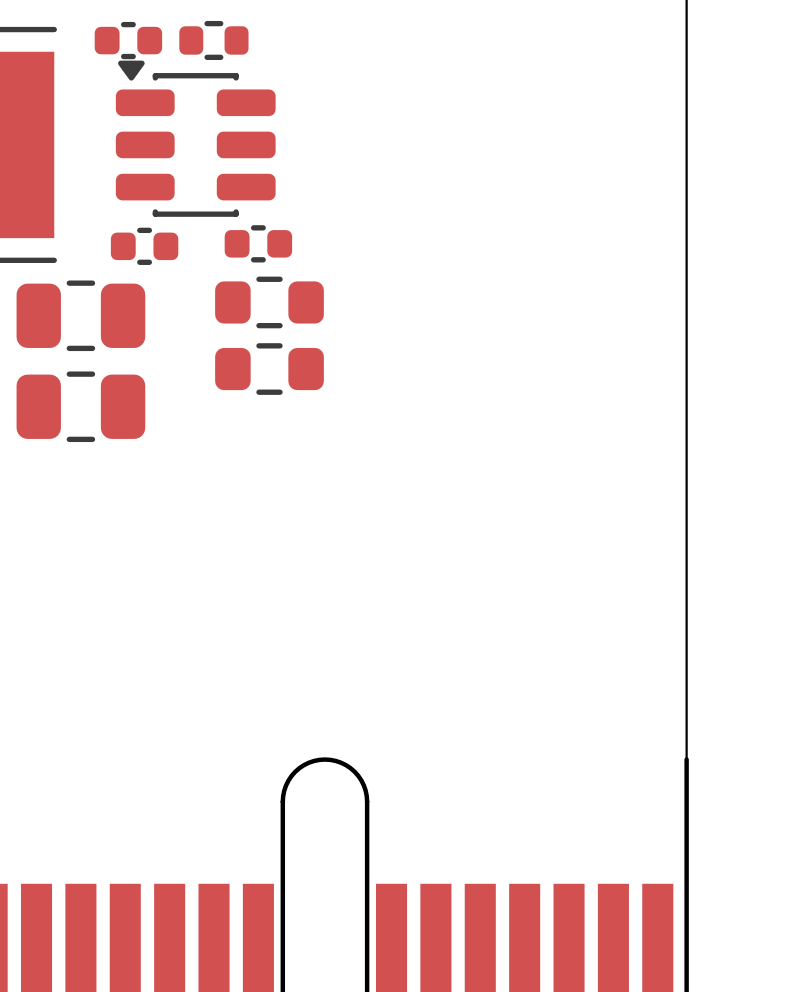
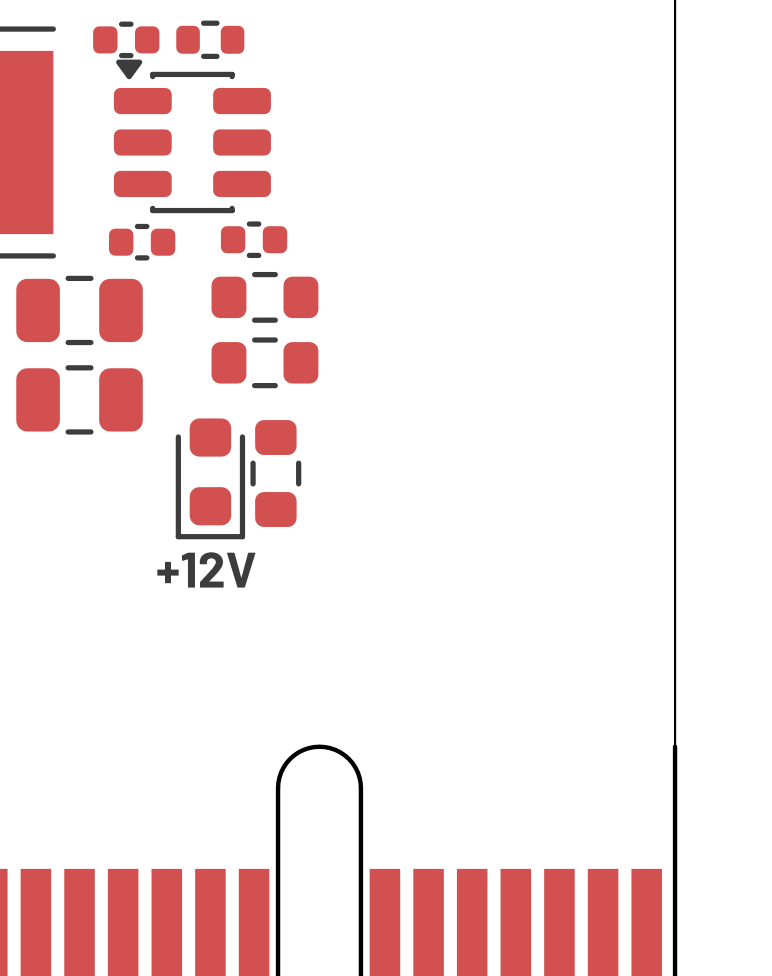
part: none -> (275, 473)
part: none -> (210, 478)
text: none -> +12V (206, 569)

